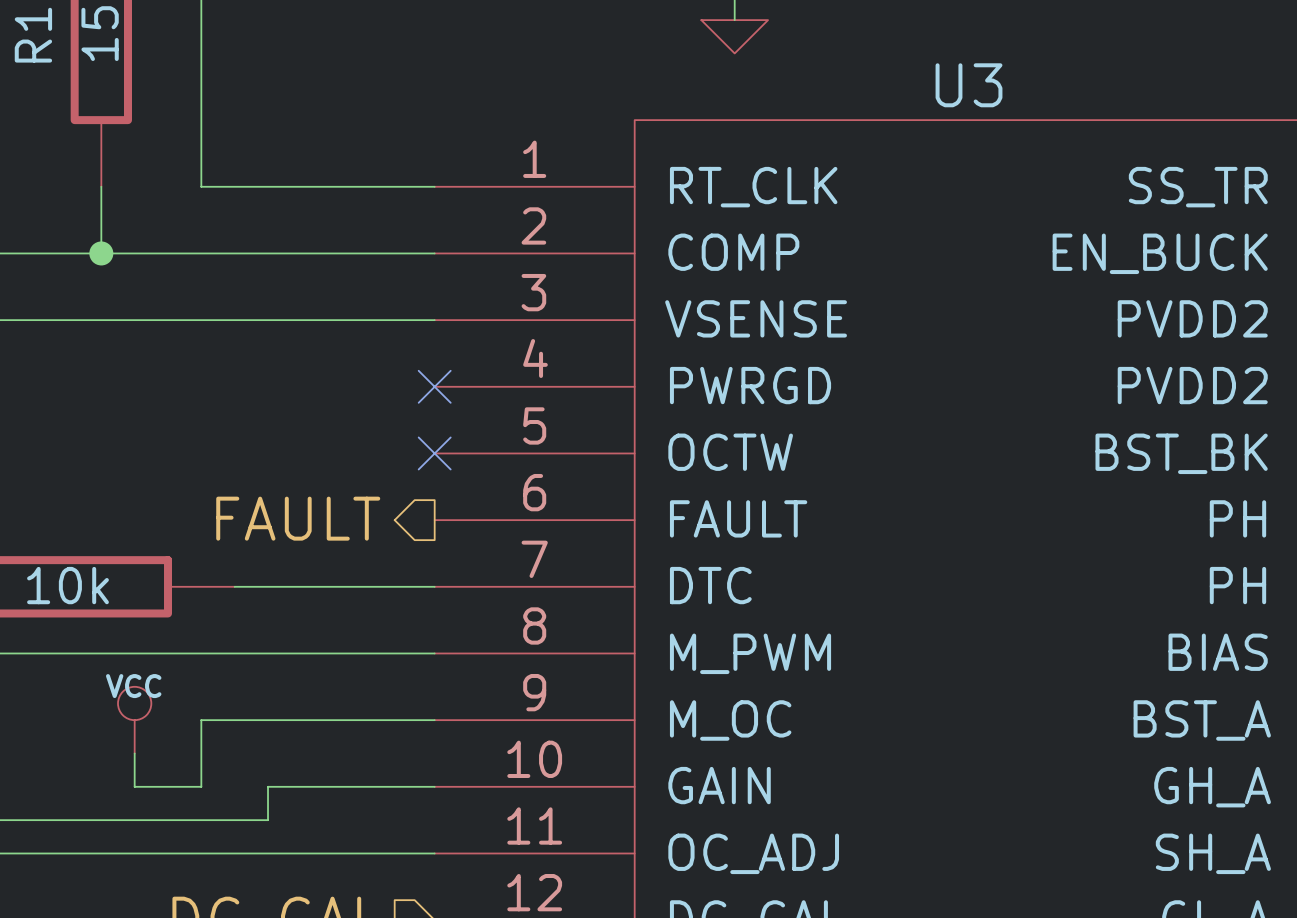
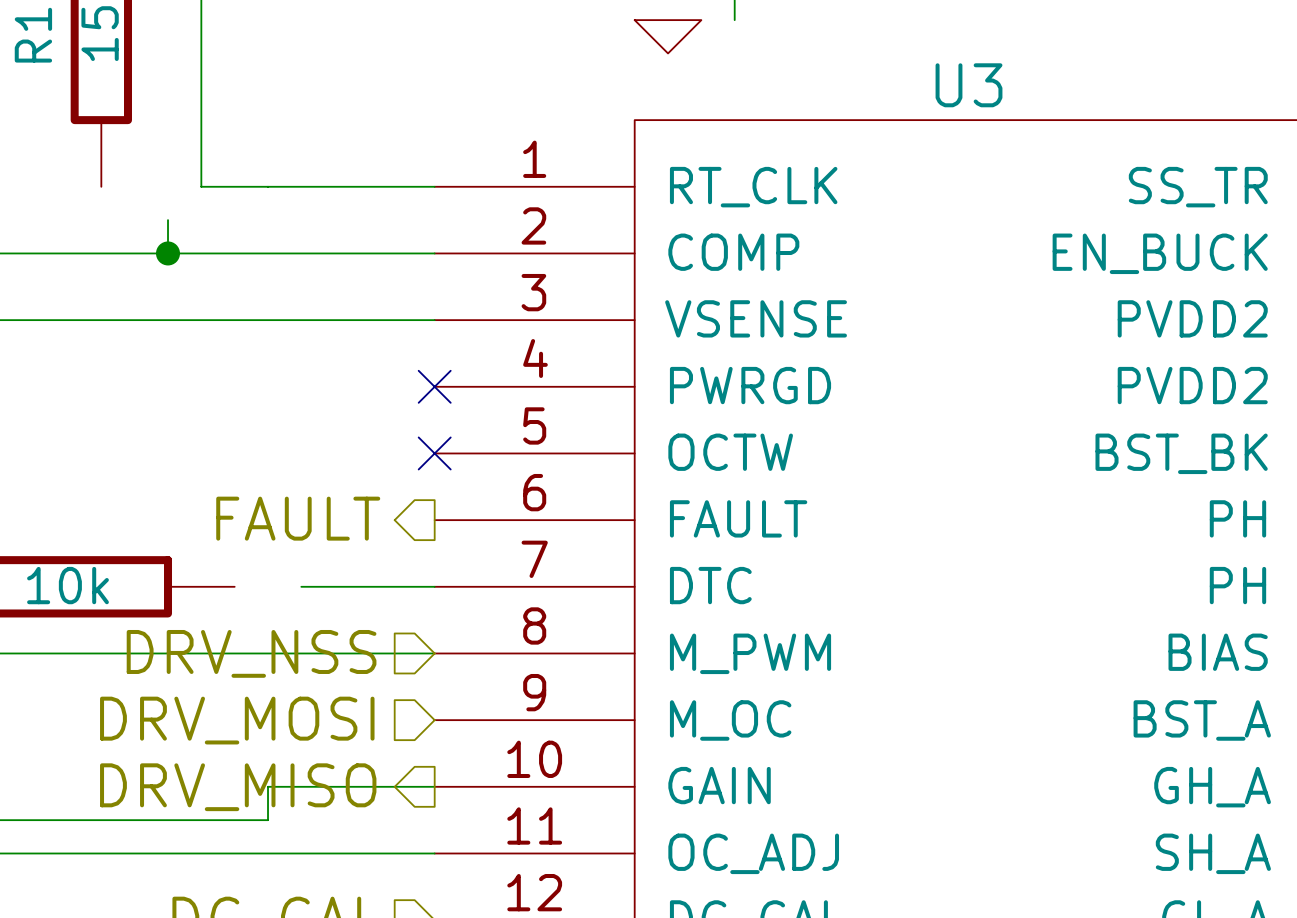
power symbol position: (734, 36) -> (668, 36)
wire: (101, 186) (101, 253) -> none
wire: none -> (168, 220) (168, 253)
junction position: (101, 253) -> (168, 253)
wire: (234, 586) (301, 586) -> none
hierarchical label: none -> DRV_NSS (251, 653)
power symbol: VCC (134, 720) -> none
hierarchical label: none -> DRV_MOSI (237, 720)
wire: (434, 720) (201, 720) (201, 786) (134, 786) (134, 753) -> none
hierarchical label: none -> DRV_MISO (238, 787)

